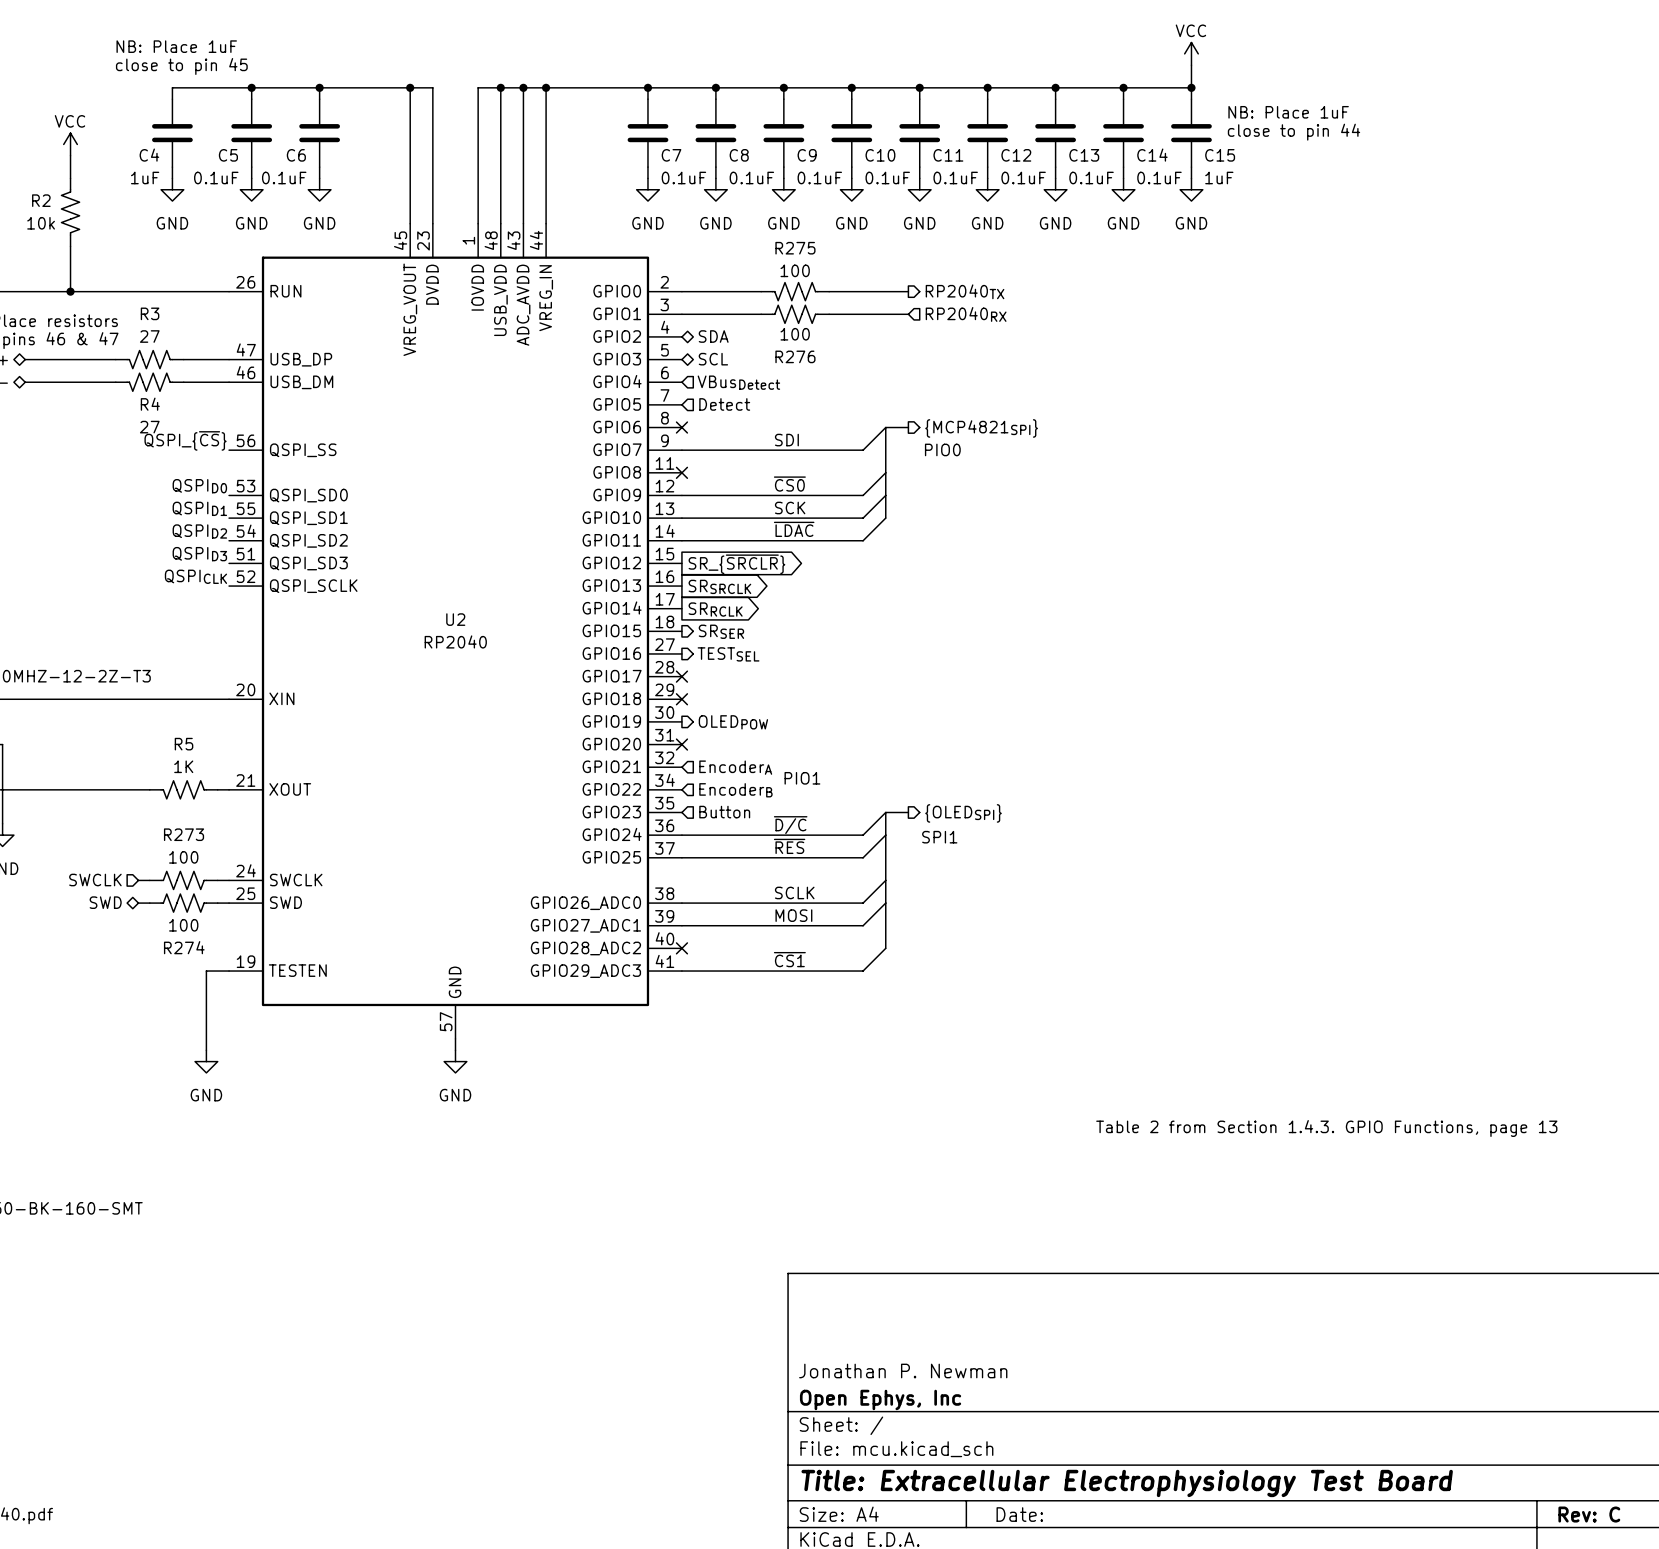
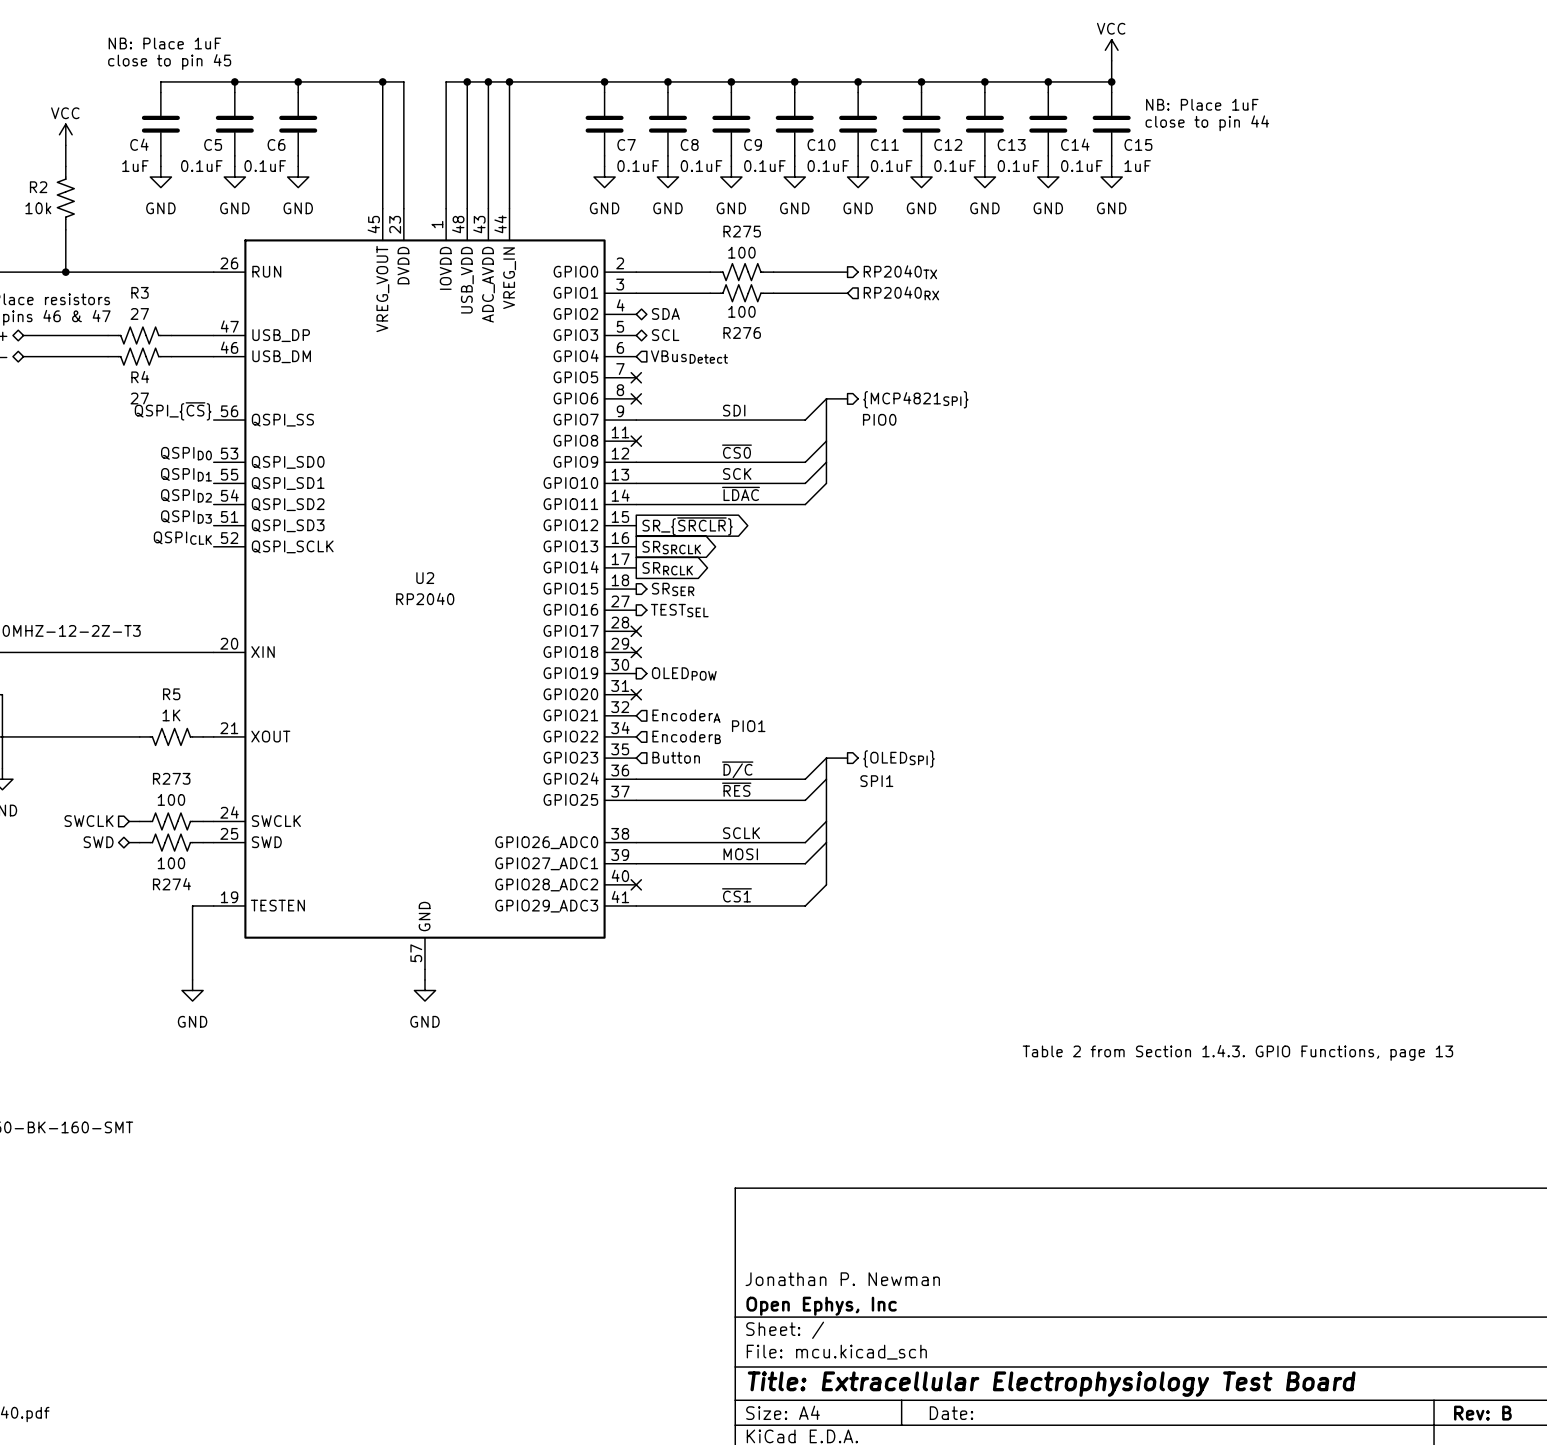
no-connect mark: none -> (636, 377)
hierarchical label: Detect (724, 404) -> none
title block: Rev: C (1589, 1514) -> Rev: B (1482, 1413)

